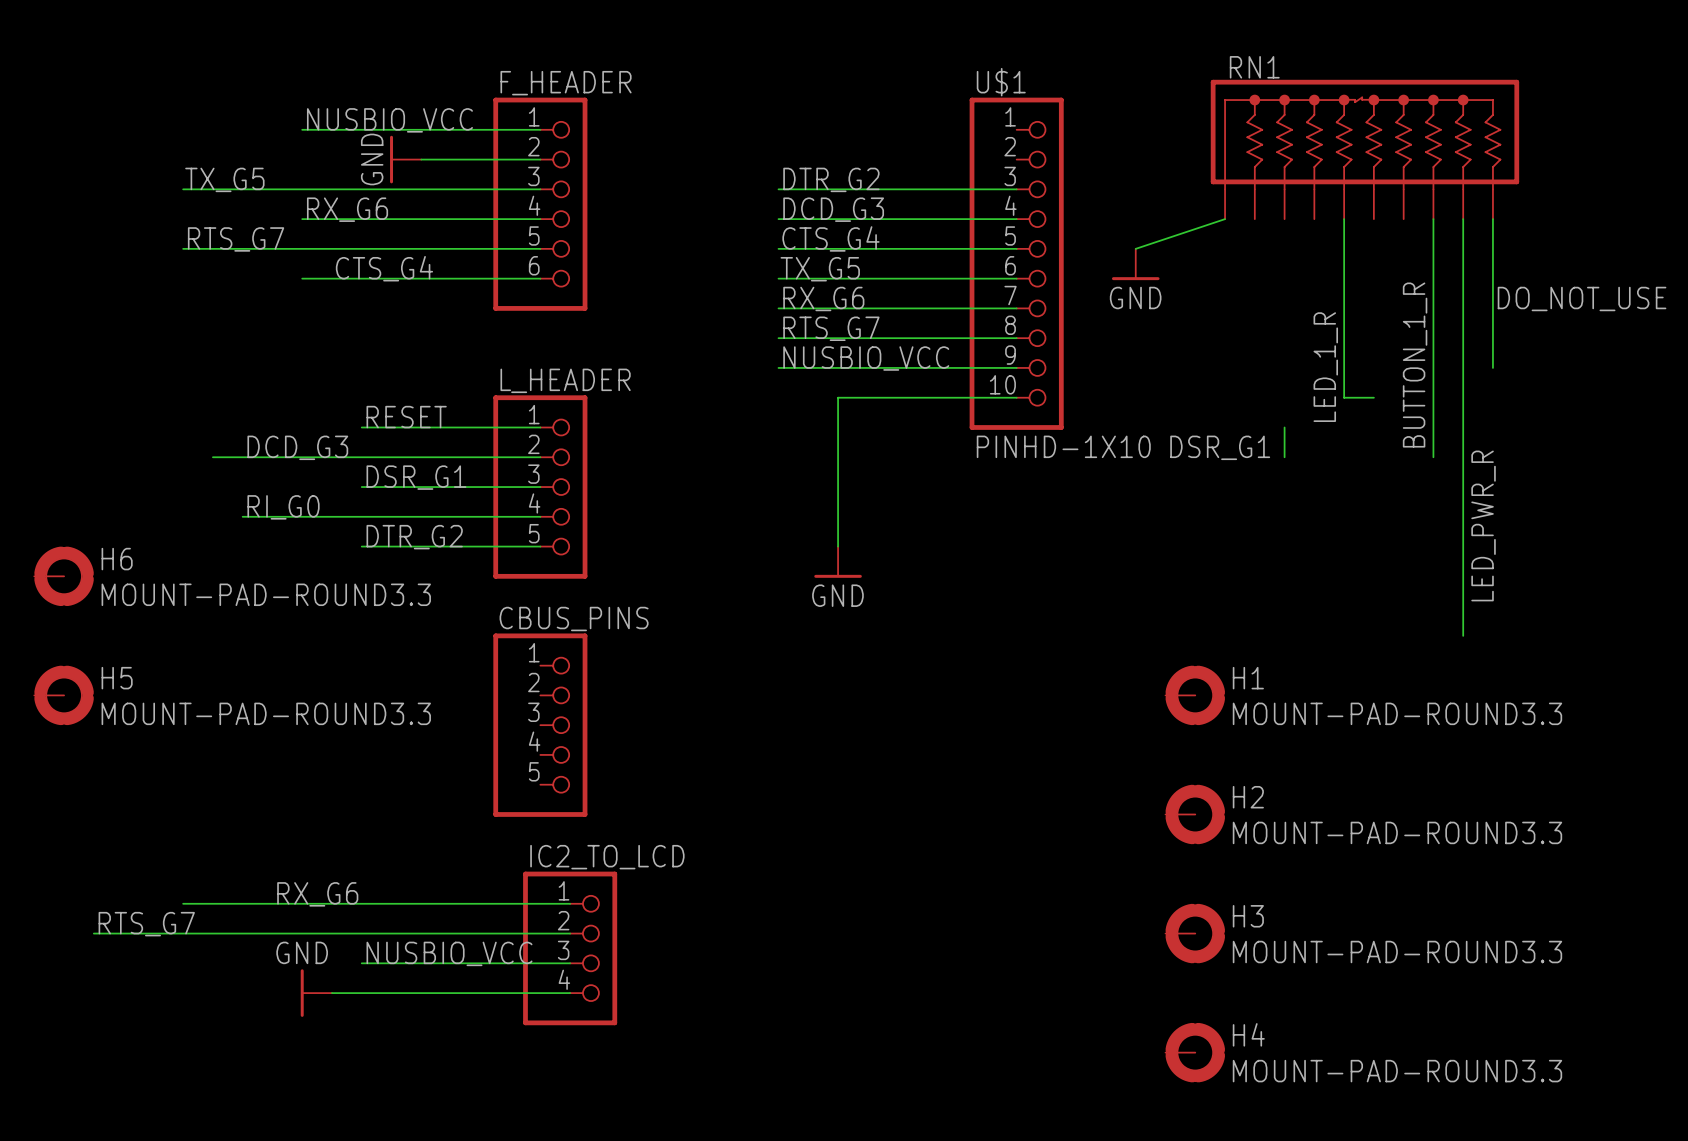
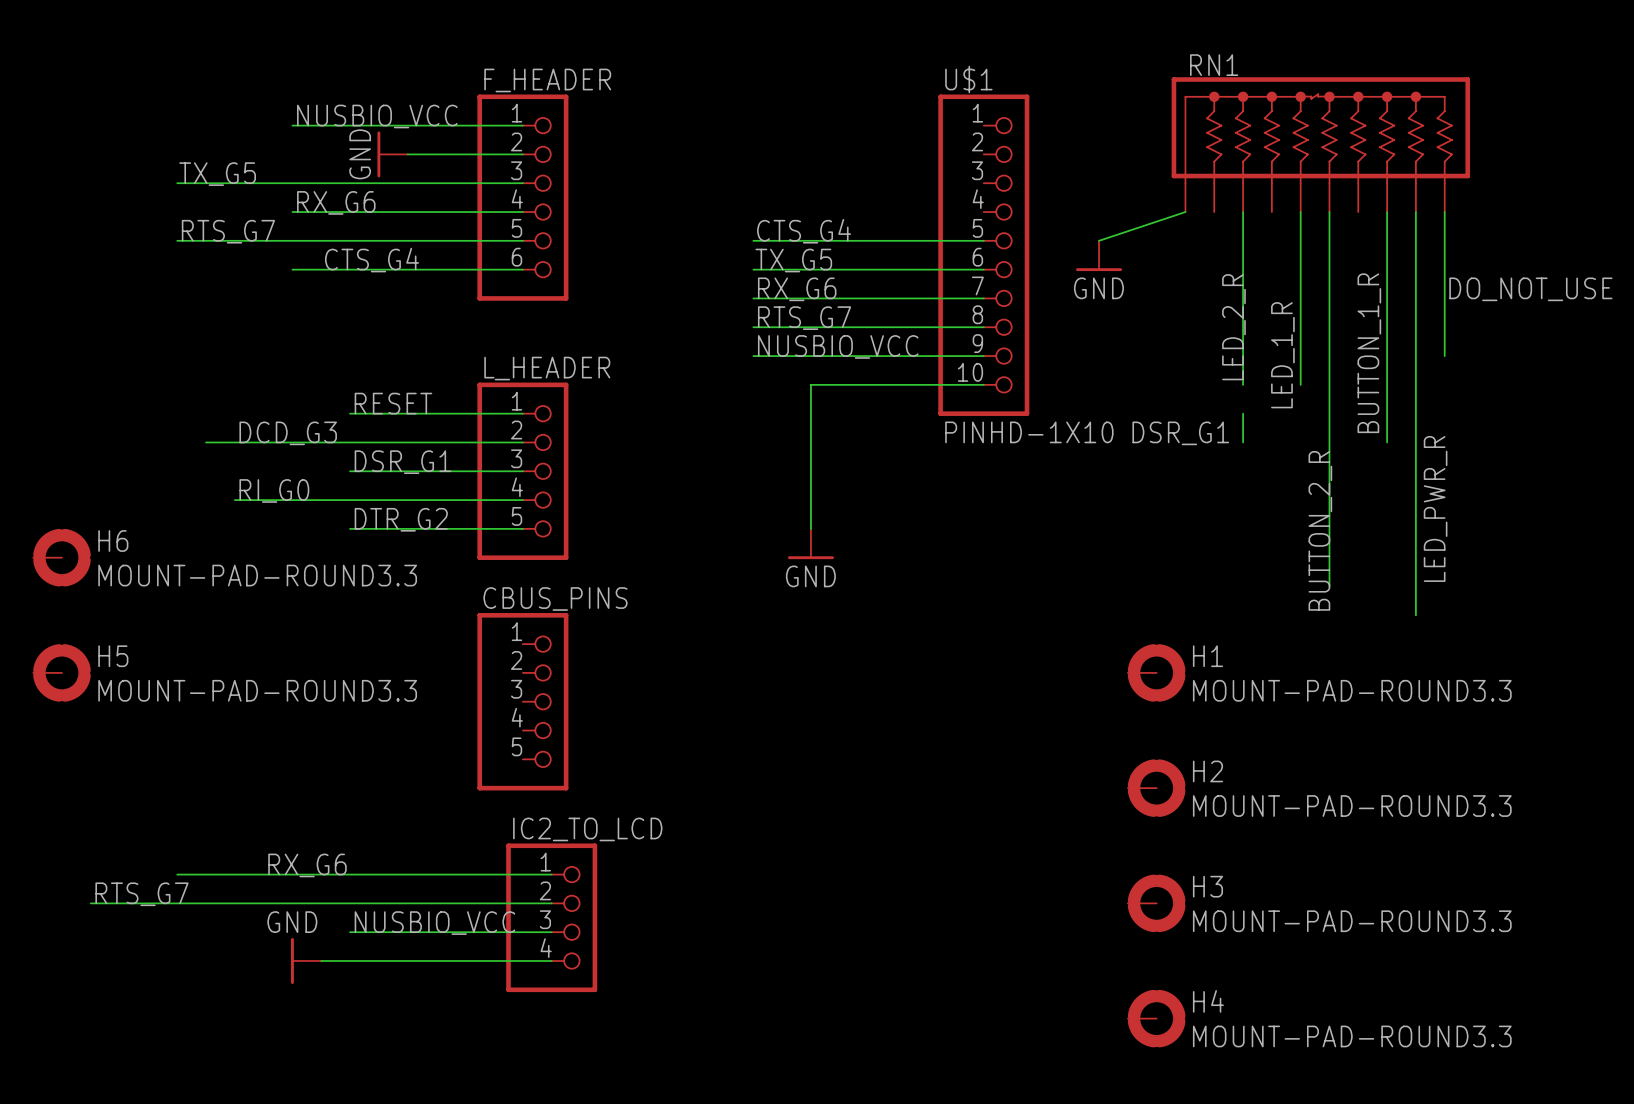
label: DTR_G2 (831, 179) -> none
wire: (778, 189) (1016, 189) -> none
label: DCD_G3 (833, 209) -> none
wire: (778, 219) (1016, 219) -> none
wire: none -> (1243, 212) (1243, 384)
wire: none -> (1329, 212) (1329, 586)
label: none -> LED_2_R (1233, 327)
wire: (1344, 397) (1373, 397) -> none
label: none -> BUTTON_2_R (1320, 530)

